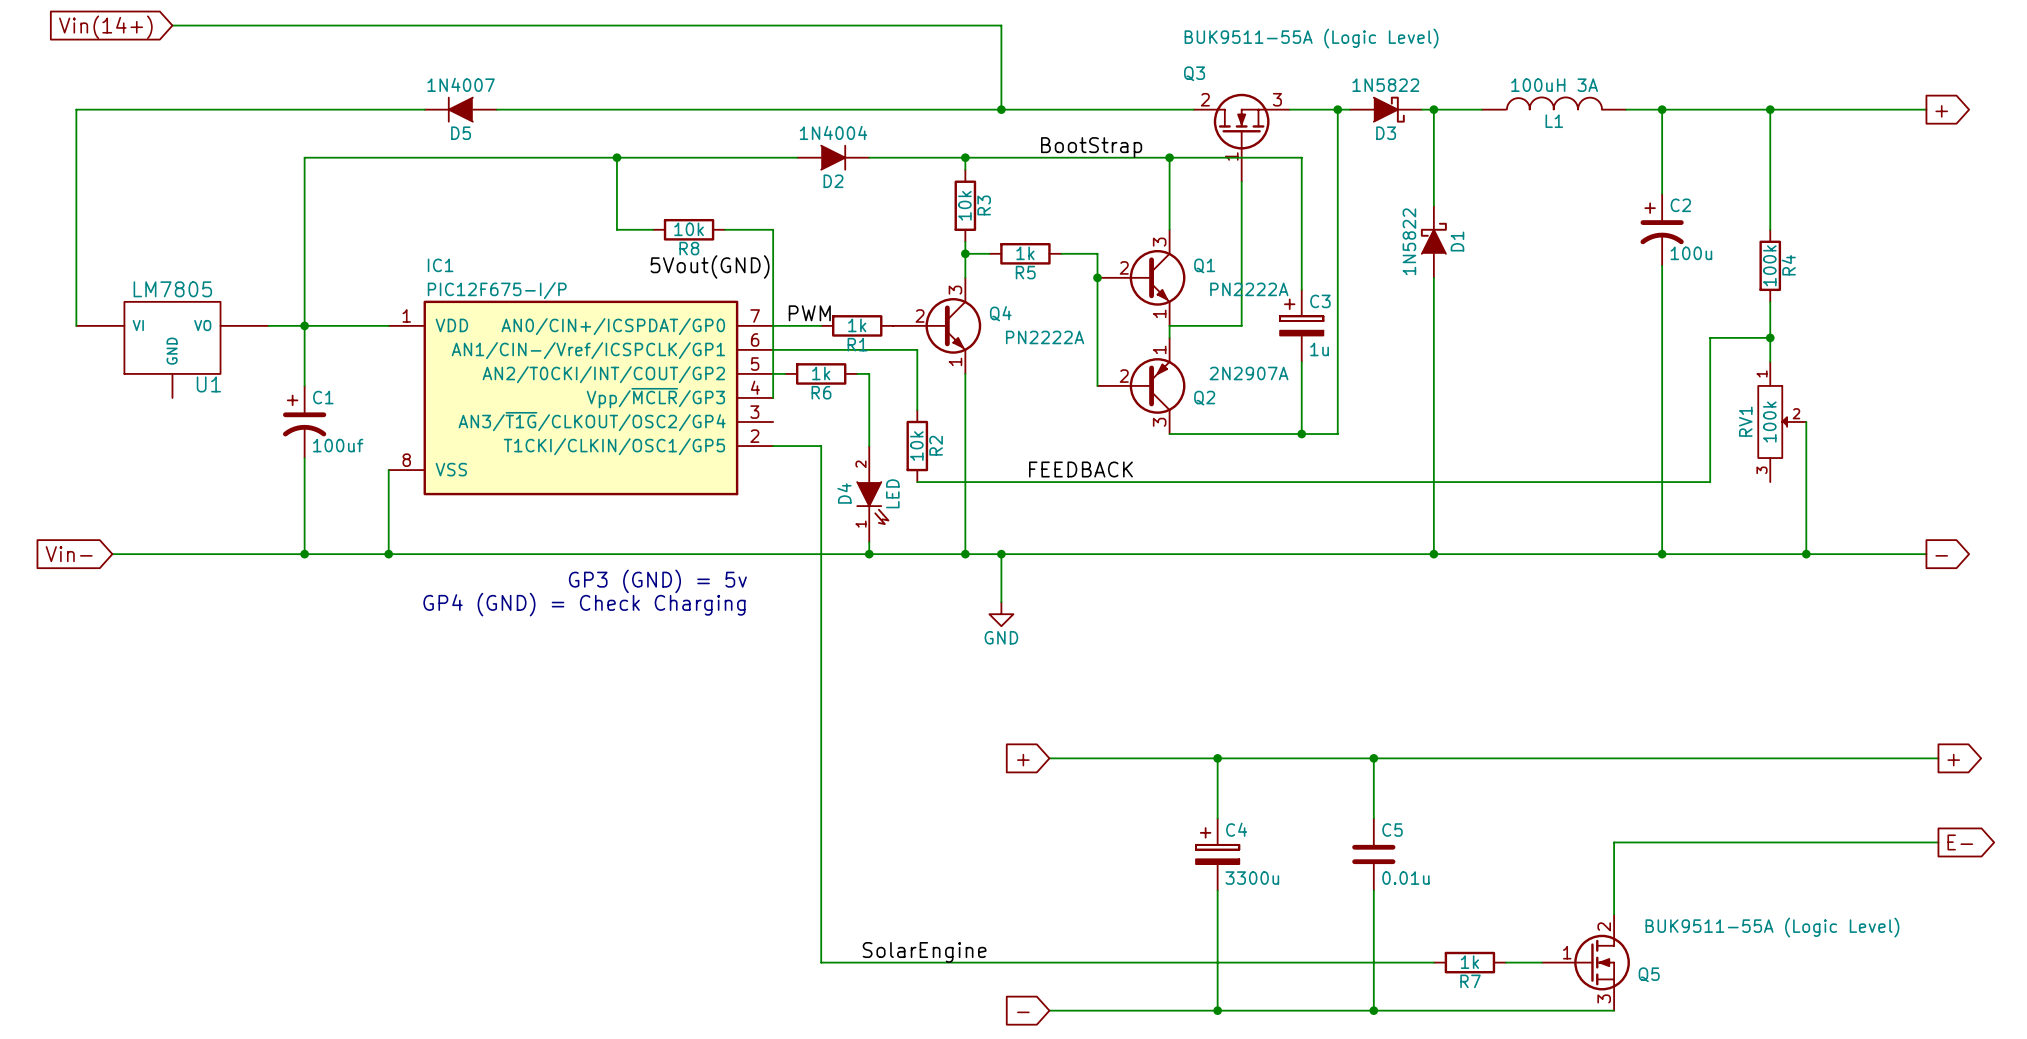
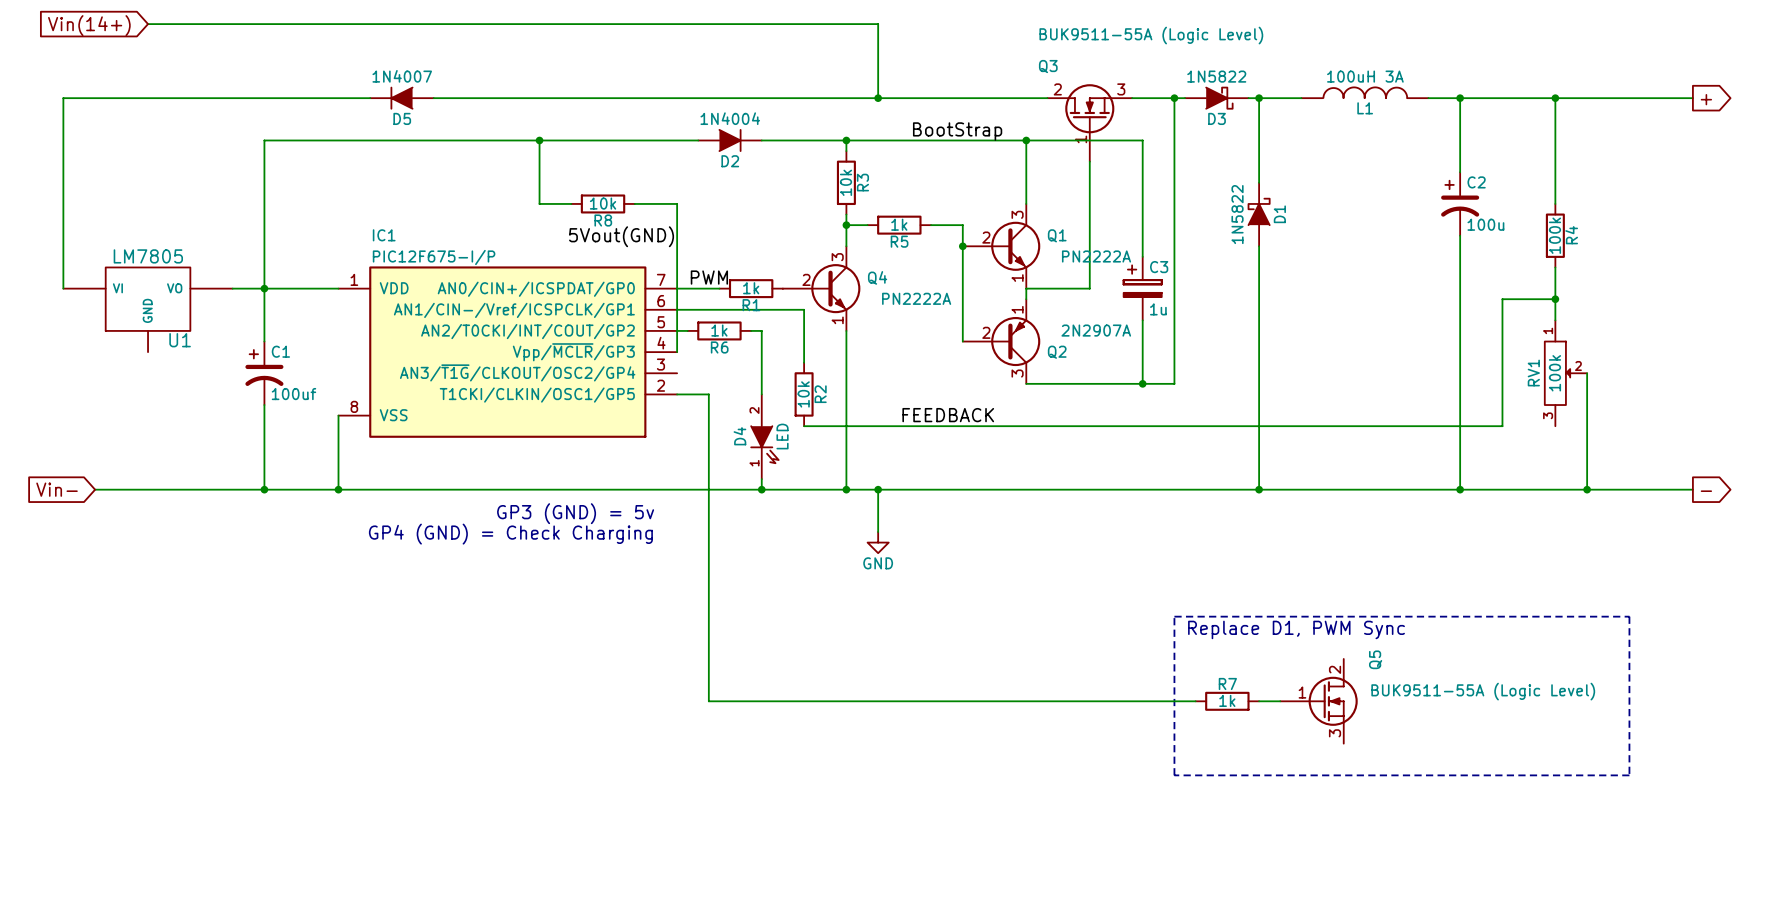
wire: (809, 446) (821, 446) (821, 962) (1433, 962) -> (708, 394) (708, 701) (1195, 701)
line: none -> (1174, 616) (1174, 775) (1629, 775) (1629, 616) (1174, 616)
text: none -> Replace D1, PWM Sync (1296, 629)
wire: (1049, 758) (1938, 758) -> none
wire: (1217, 758) (1217, 818) -> none
junction: (1217, 758) -> none
wire: (1373, 758) (1373, 818) -> none
junction: (1373, 758) -> none
global label: + (1023, 760) -> none
global label: + (1953, 760) -> none
wire: none -> (1259, 701) (1280, 701)
wire: (1938, 842) (1614, 842) (1614, 914) -> none
global label: E- (1960, 842) -> none
C4: 3300u (1217, 854) -> none
C5: 0.01u (1373, 854) -> none
wire: (1217, 890) (1217, 1010) -> none
wire: (1373, 890) (1373, 1010) -> none
Q5 value position: BUK9511-55A (Logic Level) (1772, 927) -> BUK9511-55A (Logic Level) (1483, 691)
label: SolarEngine (924, 952) -> none
R7 position: (1469, 962) -> (1227, 701)
wire: (1505, 962) (1542, 962) -> none
Q5 position: (1585, 962) -> (1318, 701)
Q5 name rotation: 0° (1649, 974) -> 90° counterclockwise (1375, 659)
Q5 name position: Q5 (1649, 974) -> Q5 (1375, 659)
R7 name position: R7 (1470, 981) -> R7 (1227, 683)
wire: (1049, 1010) (1614, 1010) -> none
junction: (1217, 1010) -> none
junction: (1373, 1010) -> none
global label: - (1023, 1012) -> none

